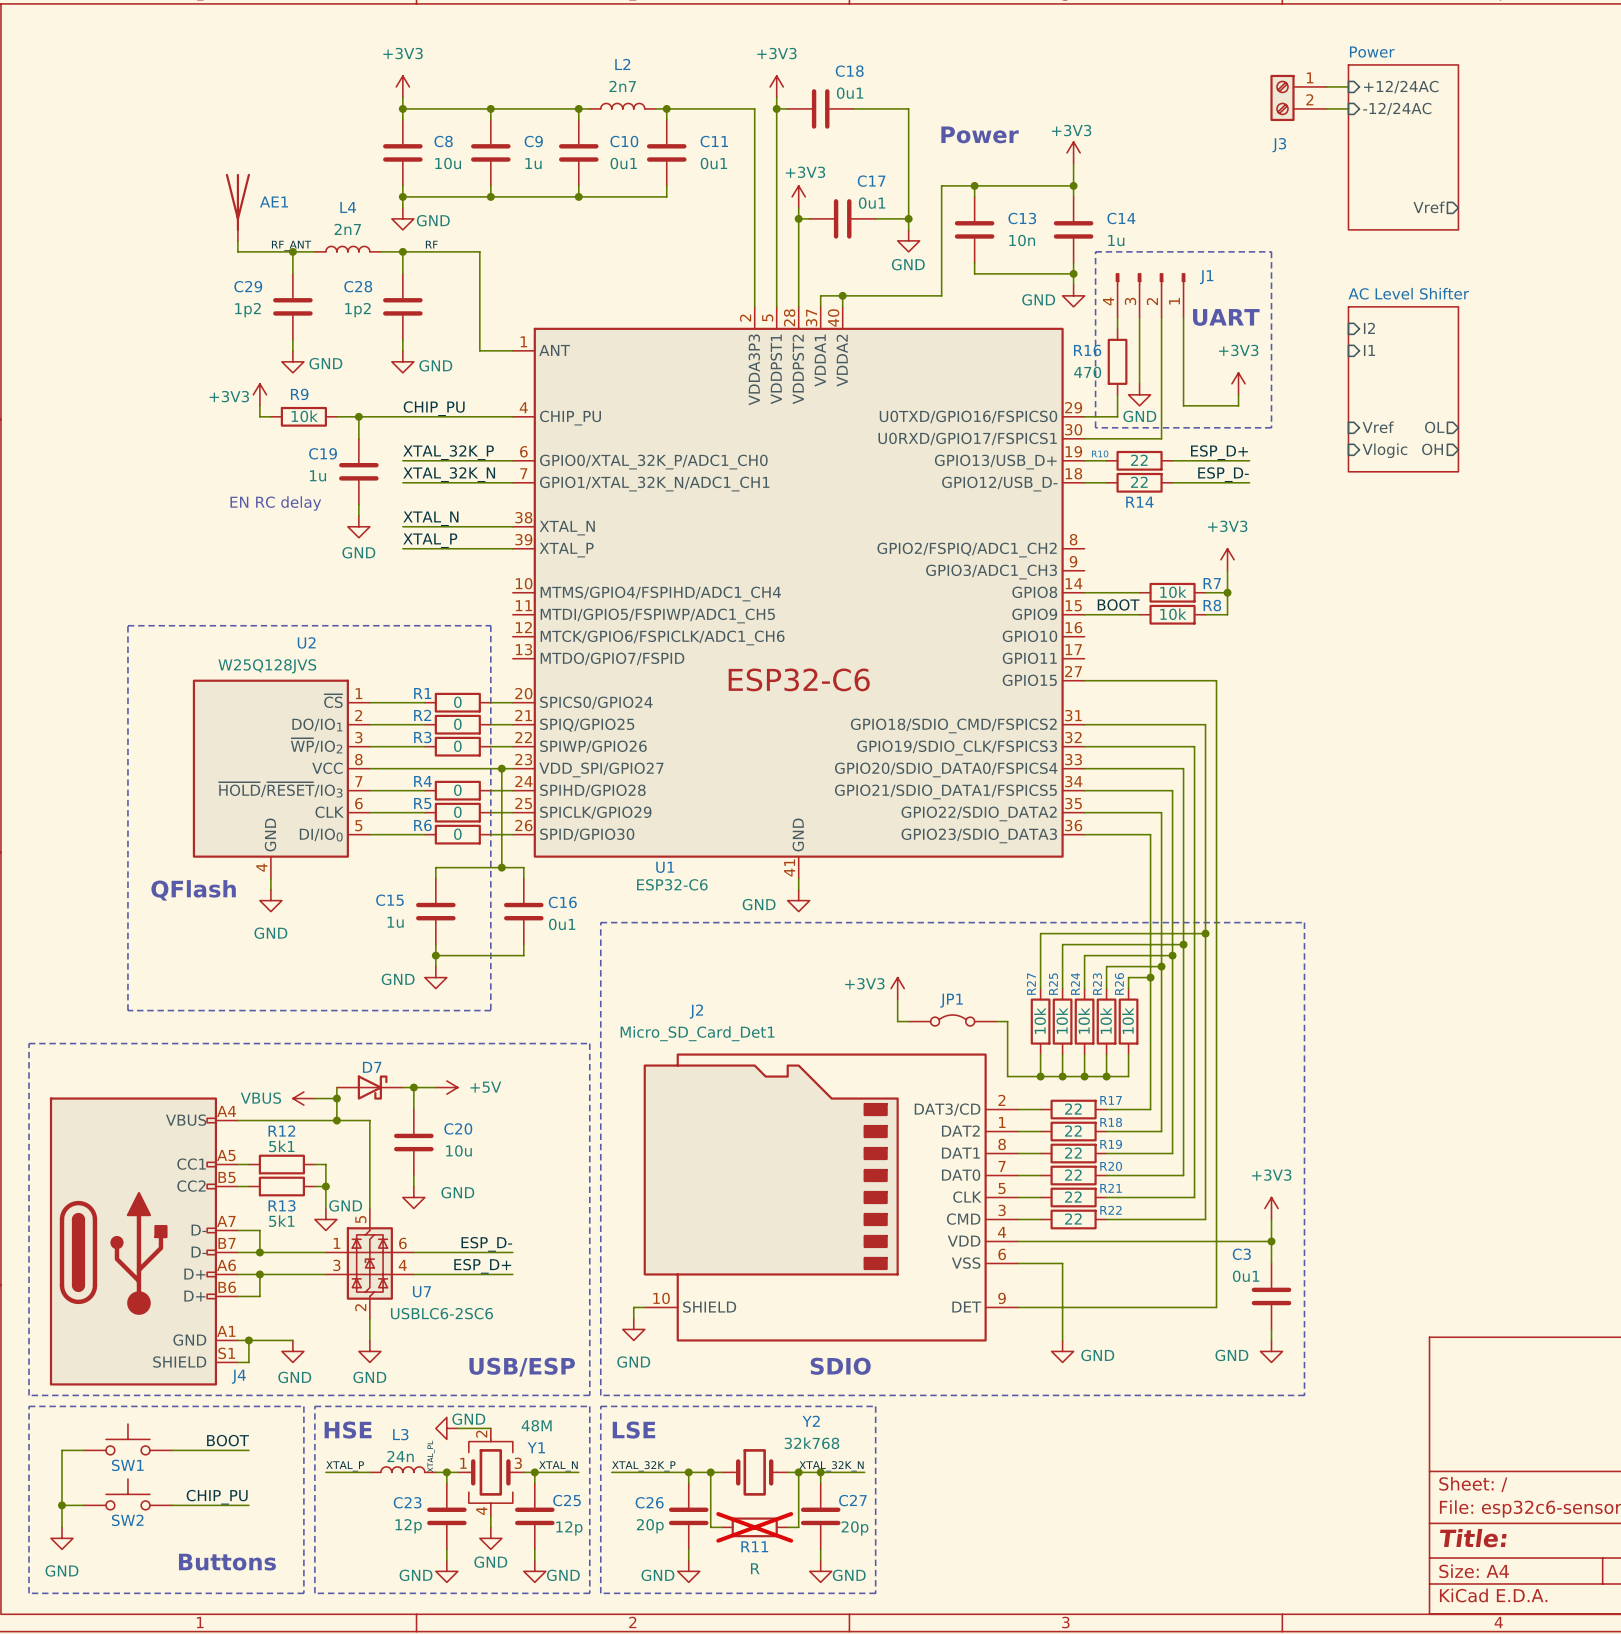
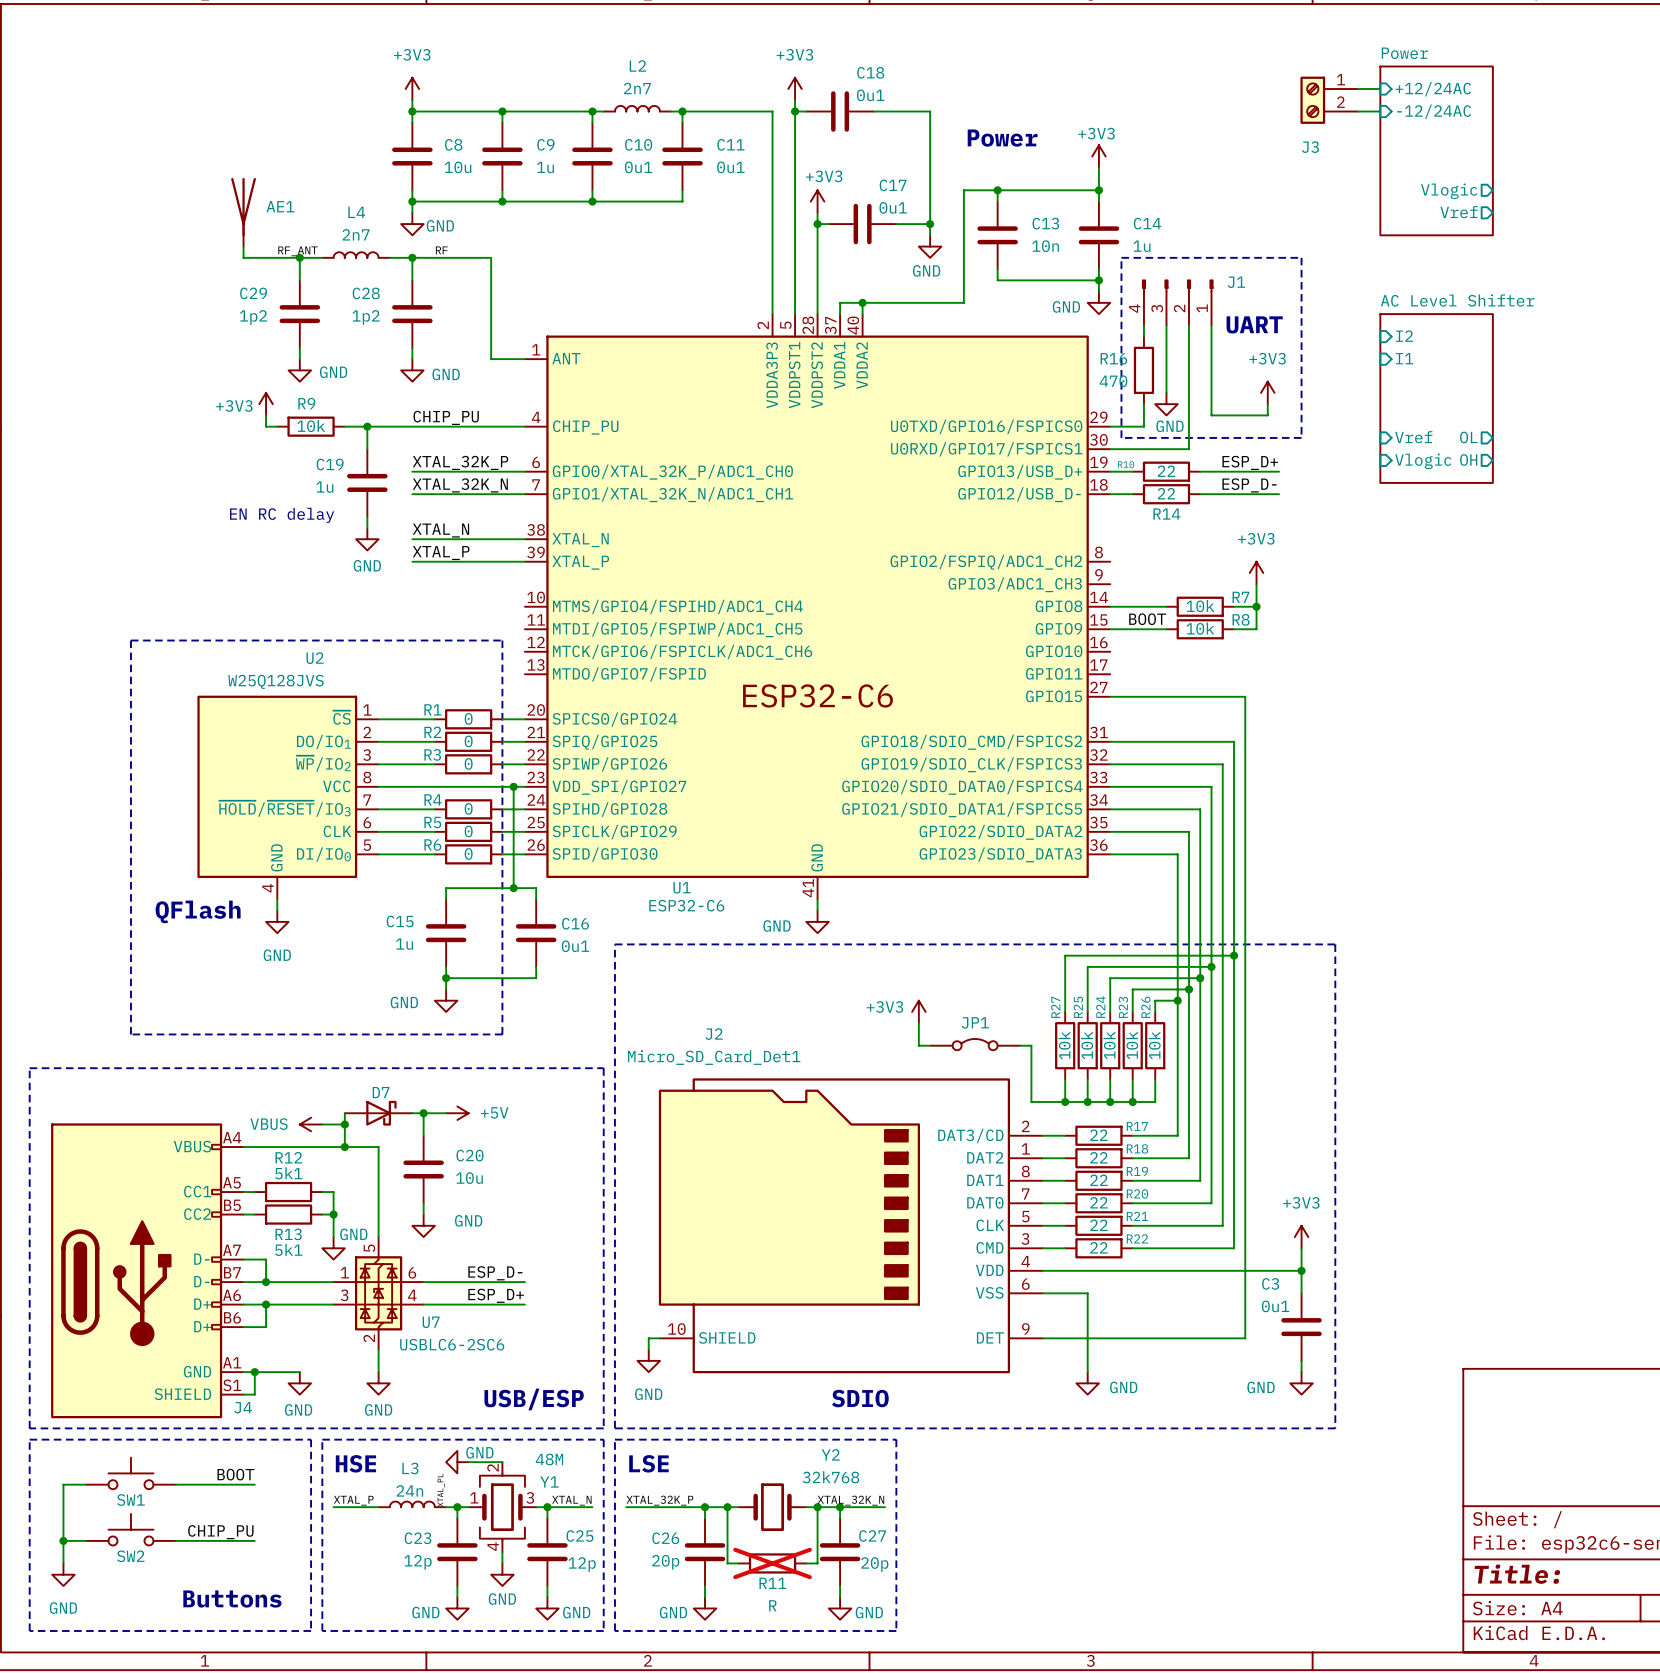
sheet pin: none -> Vlogic (1449, 191)

